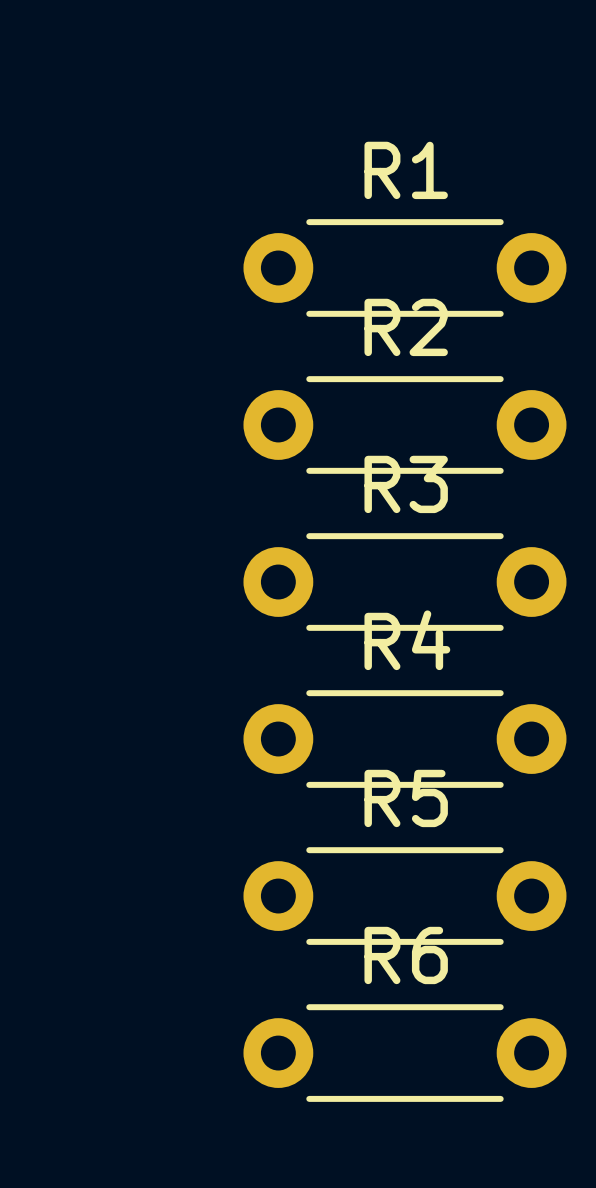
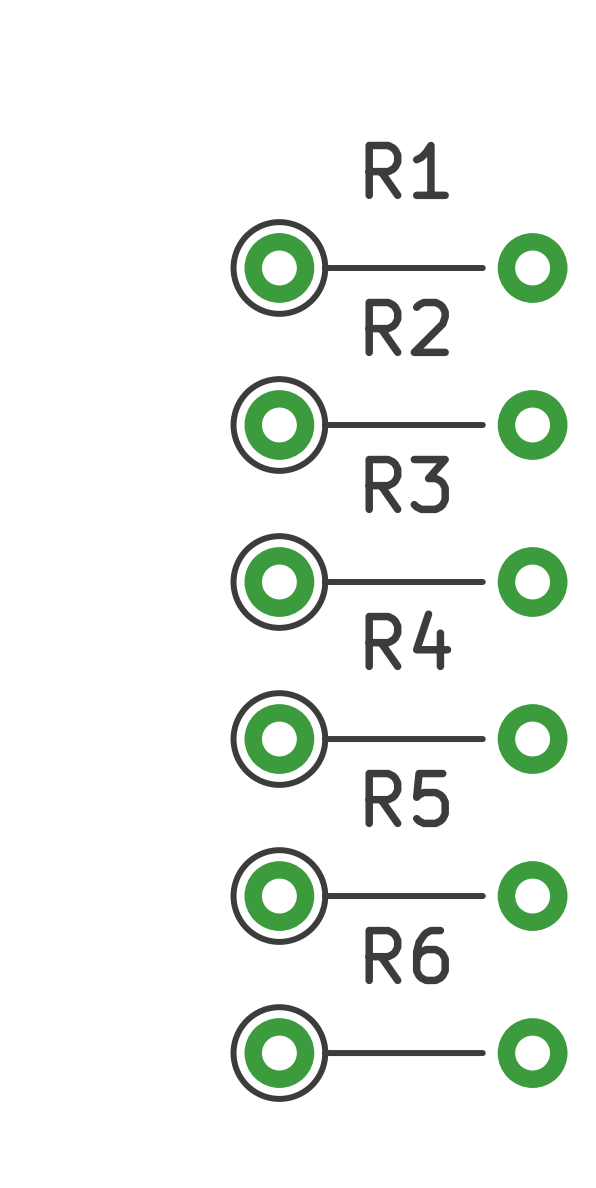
R1 footprint: [243, 219, 567, 317] -> [230, 219, 568, 317]
R2 footprint: [243, 376, 567, 474] -> [230, 376, 568, 474]
R3 footprint: [243, 533, 567, 631] -> [230, 533, 568, 631]
R4 footprint: [243, 690, 567, 788] -> [230, 690, 568, 788]
R5 footprint: [243, 847, 567, 945] -> [230, 847, 568, 945]
R6 footprint: [243, 1004, 567, 1102] -> [230, 1004, 568, 1102]

